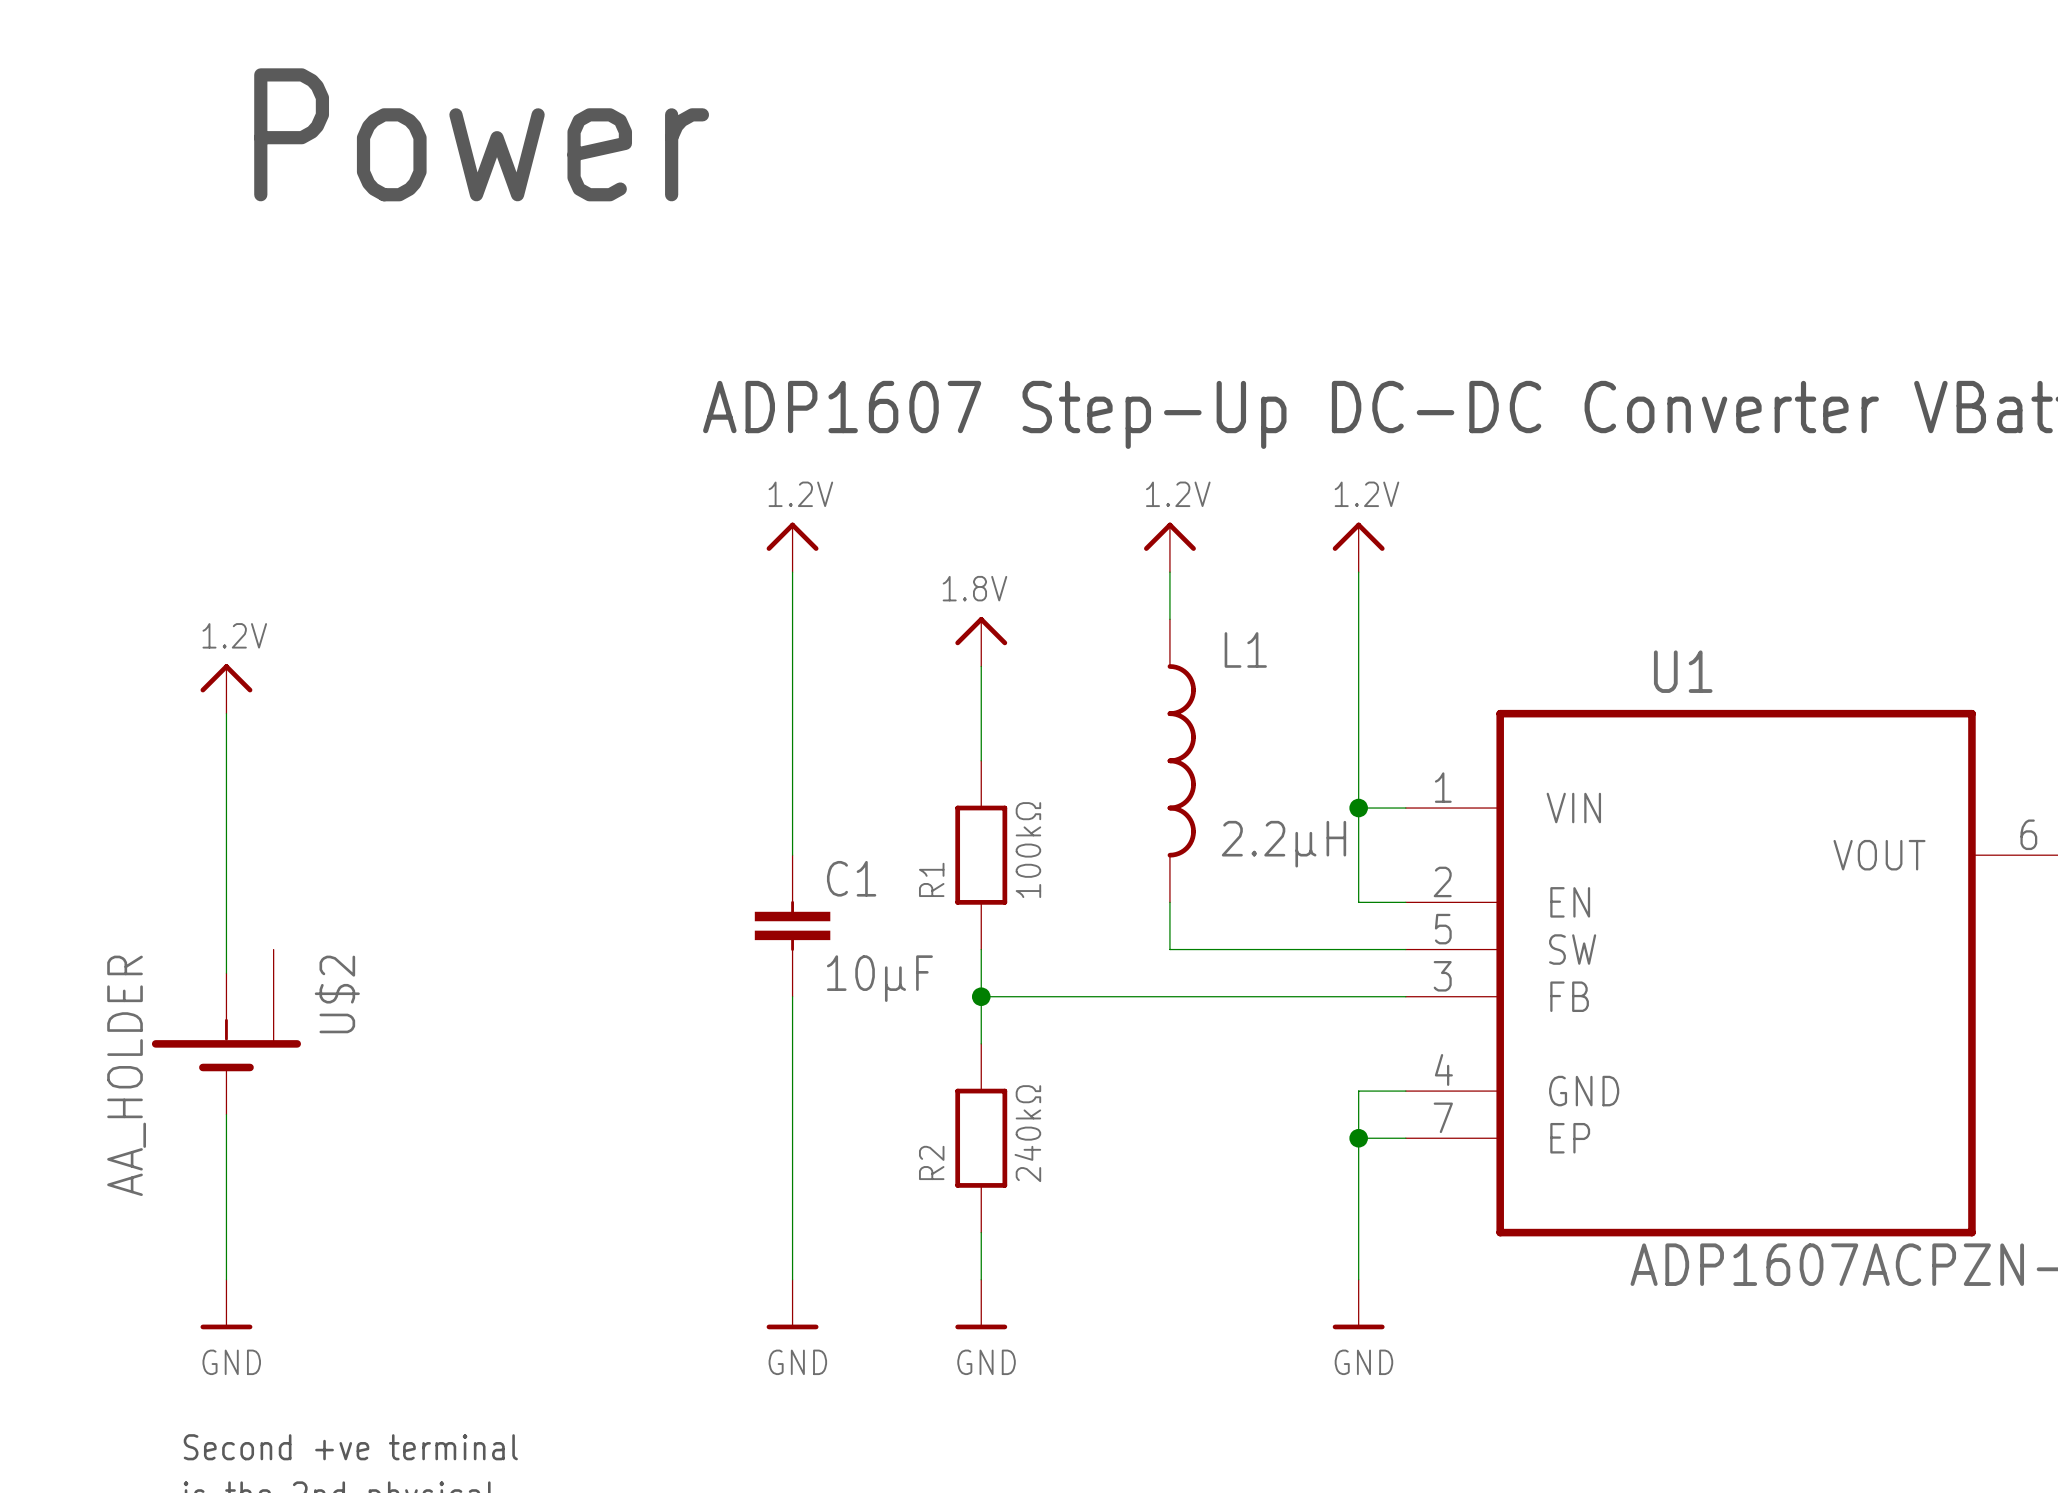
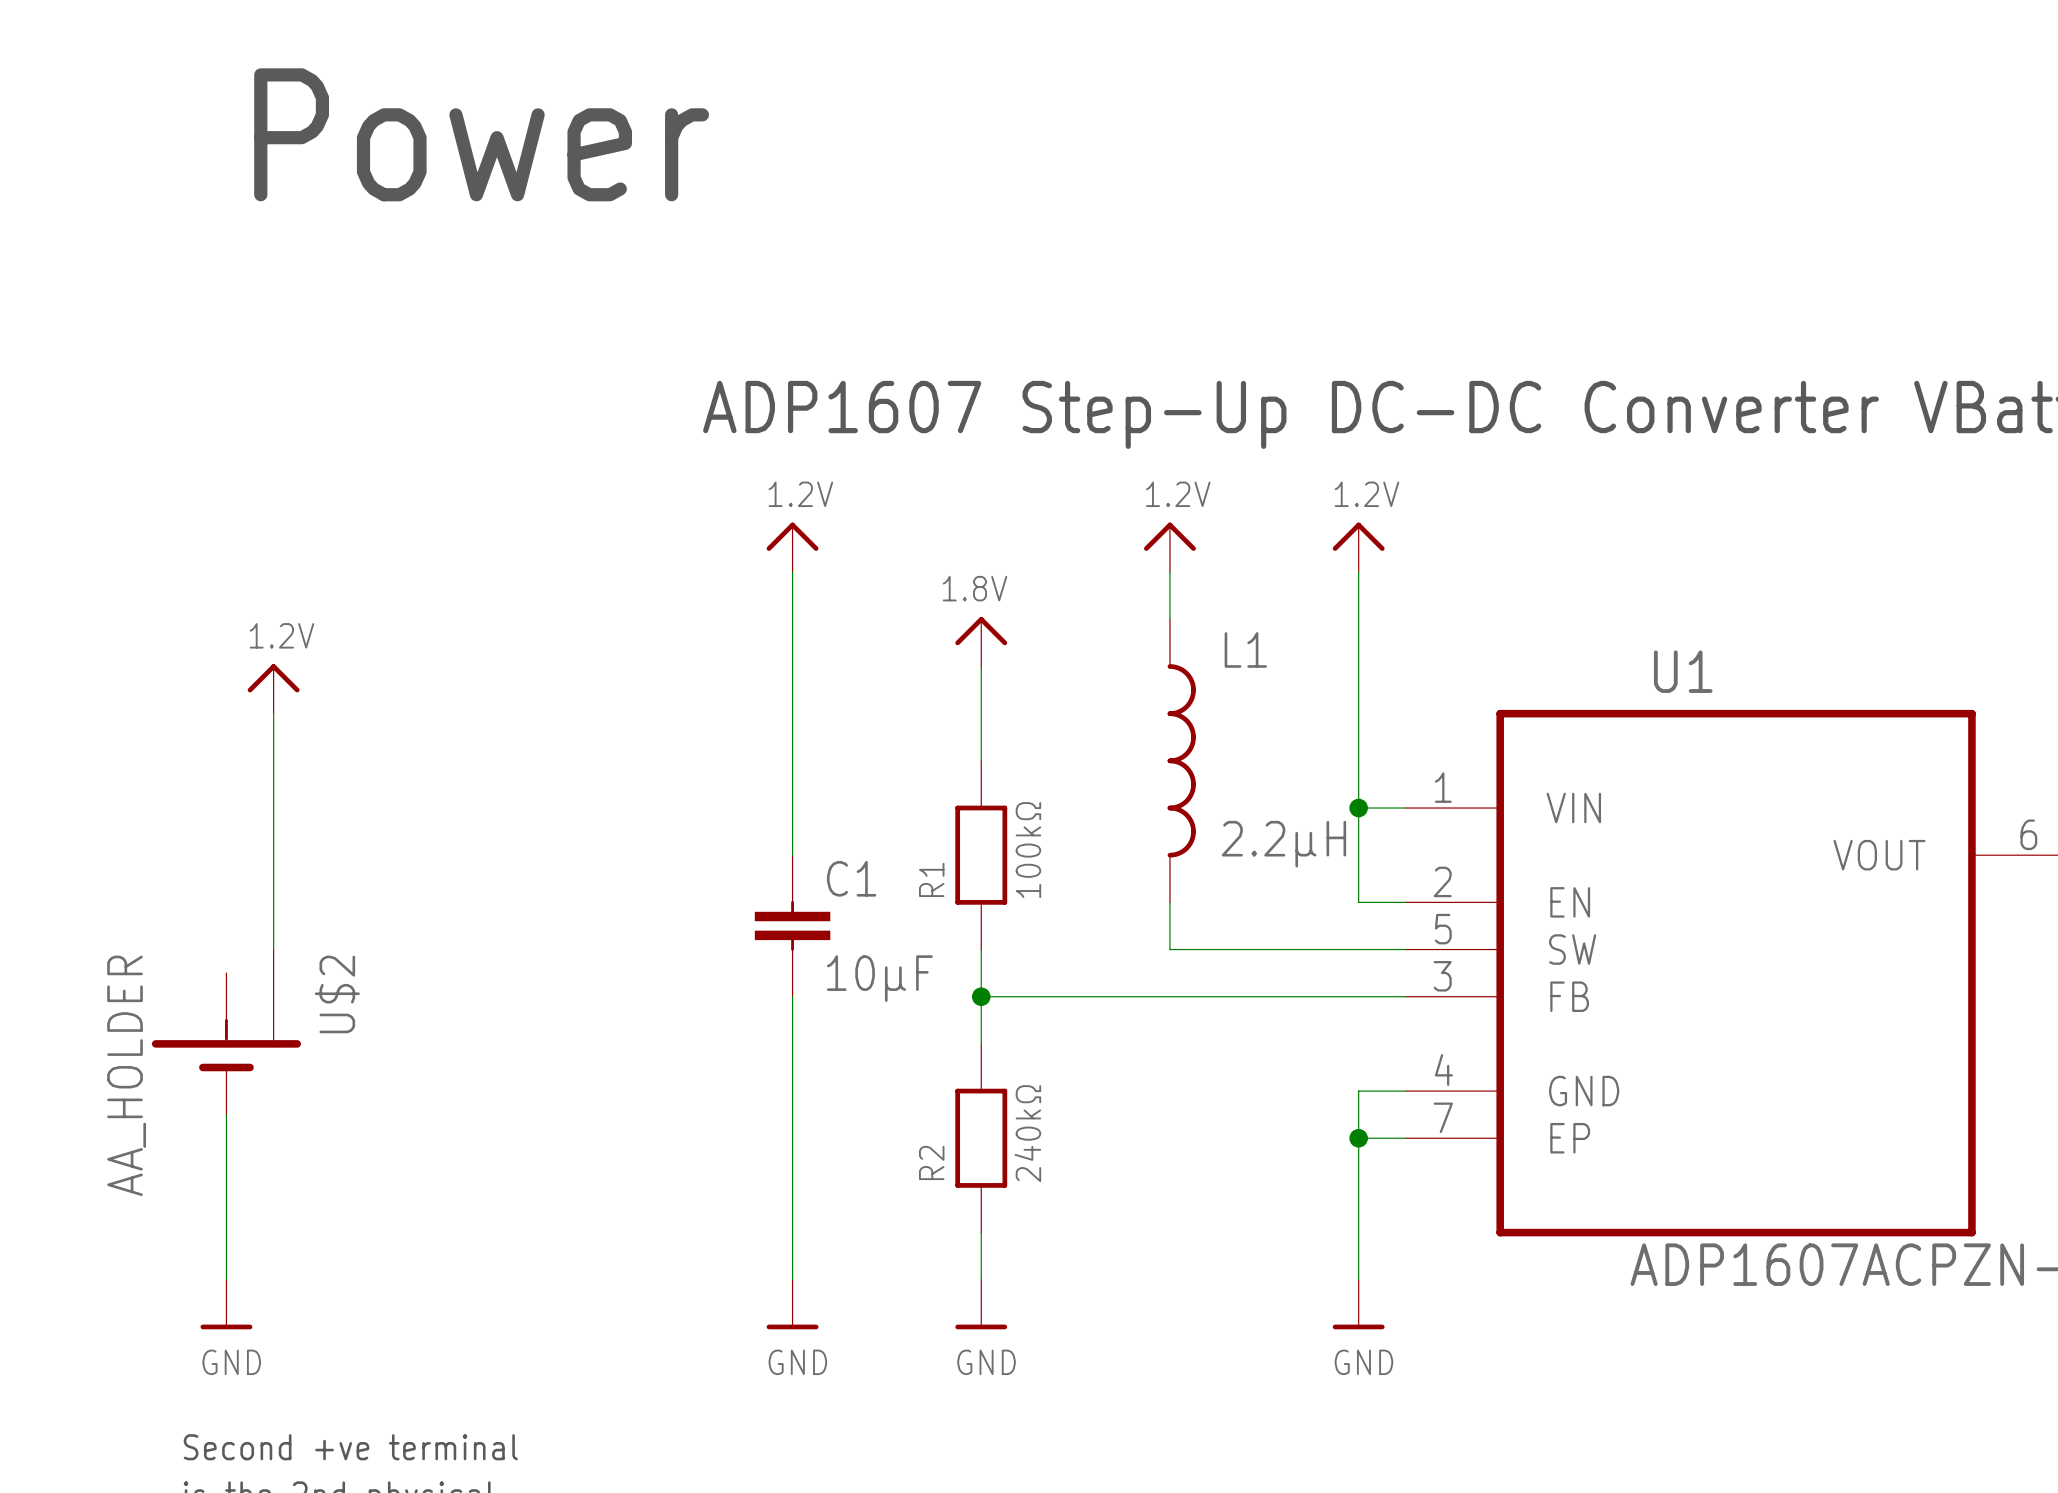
power symbol position: 1.2V (226, 688) -> 1.2V (273, 688)
wire: (226, 713) (226, 973) -> none
wire: none -> (273, 713) (273, 949)

